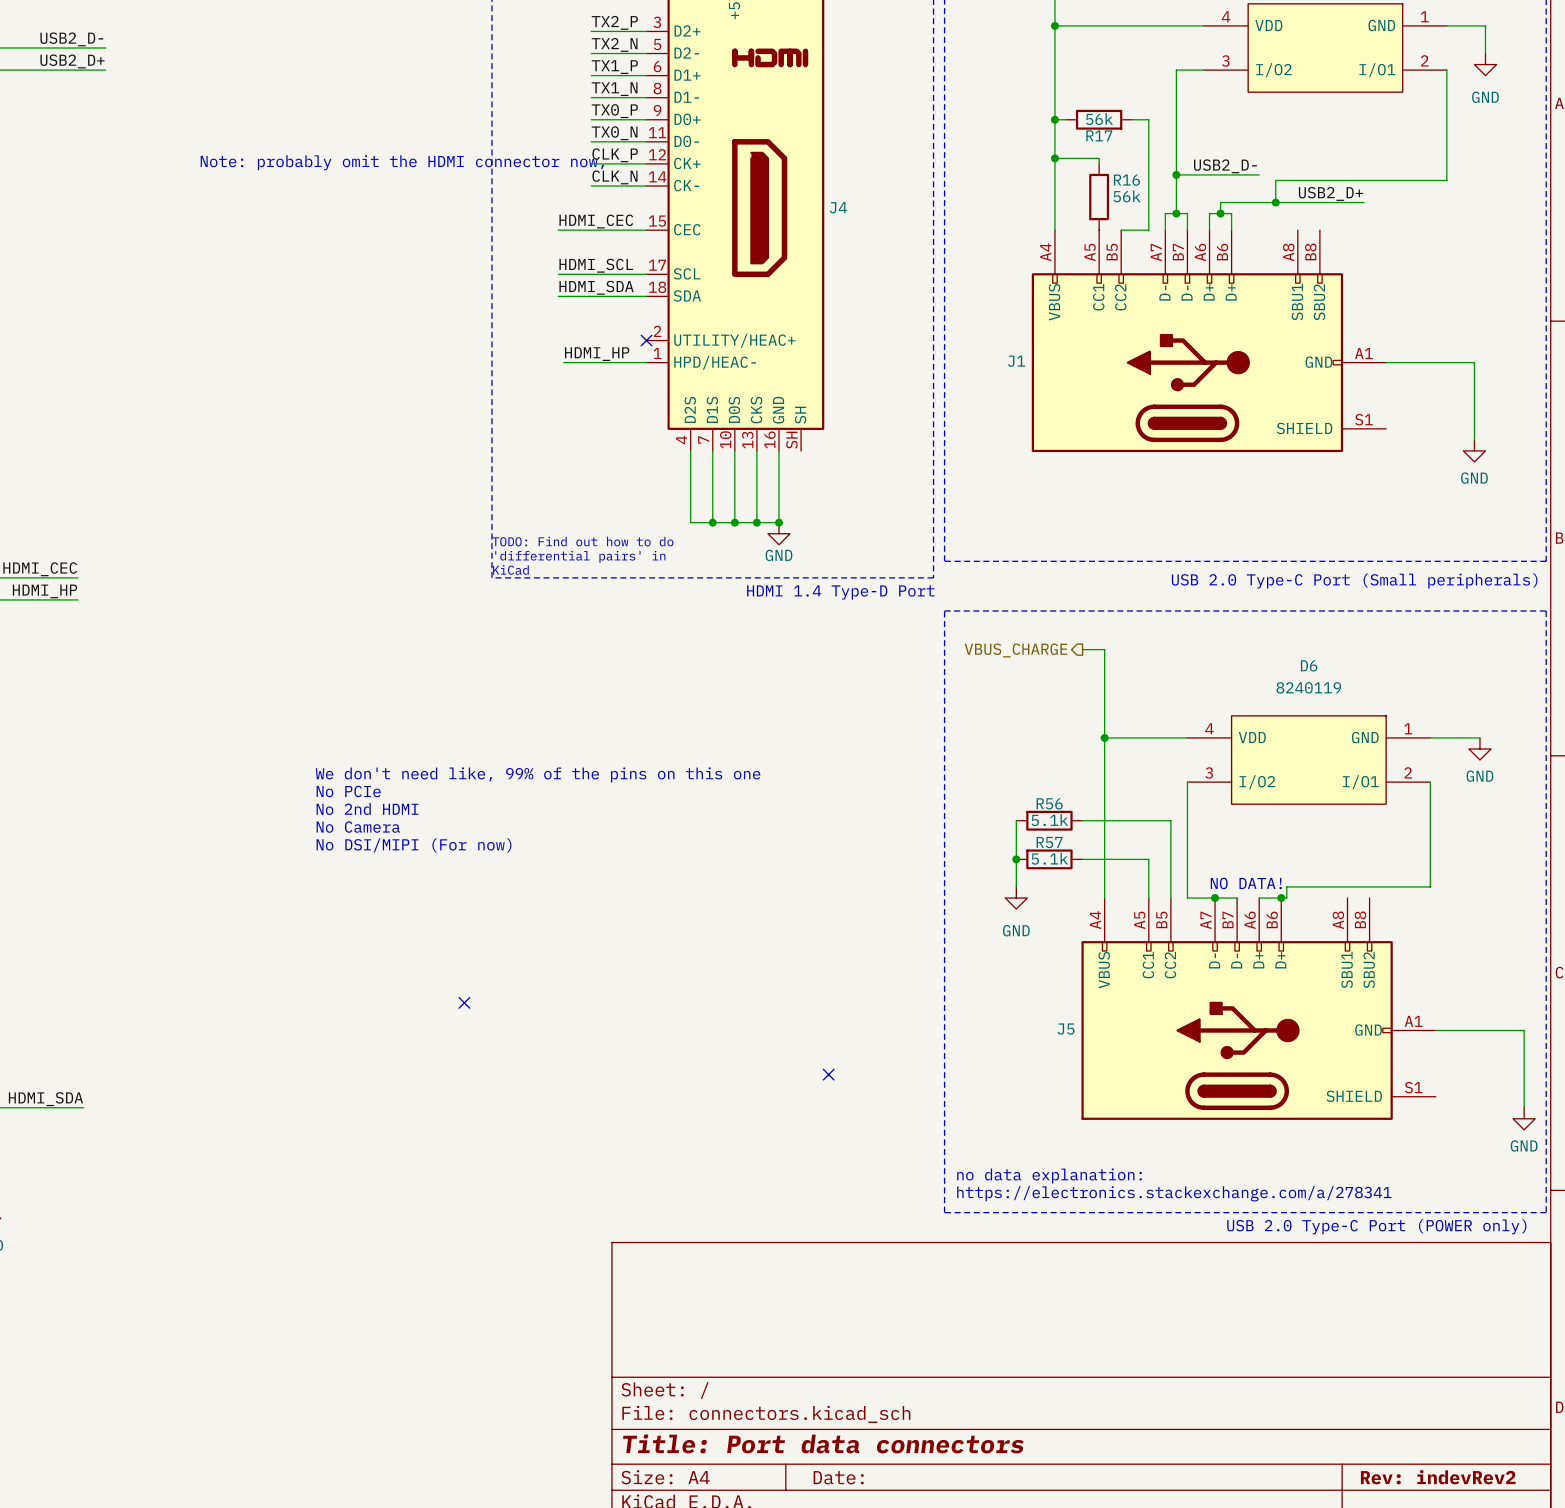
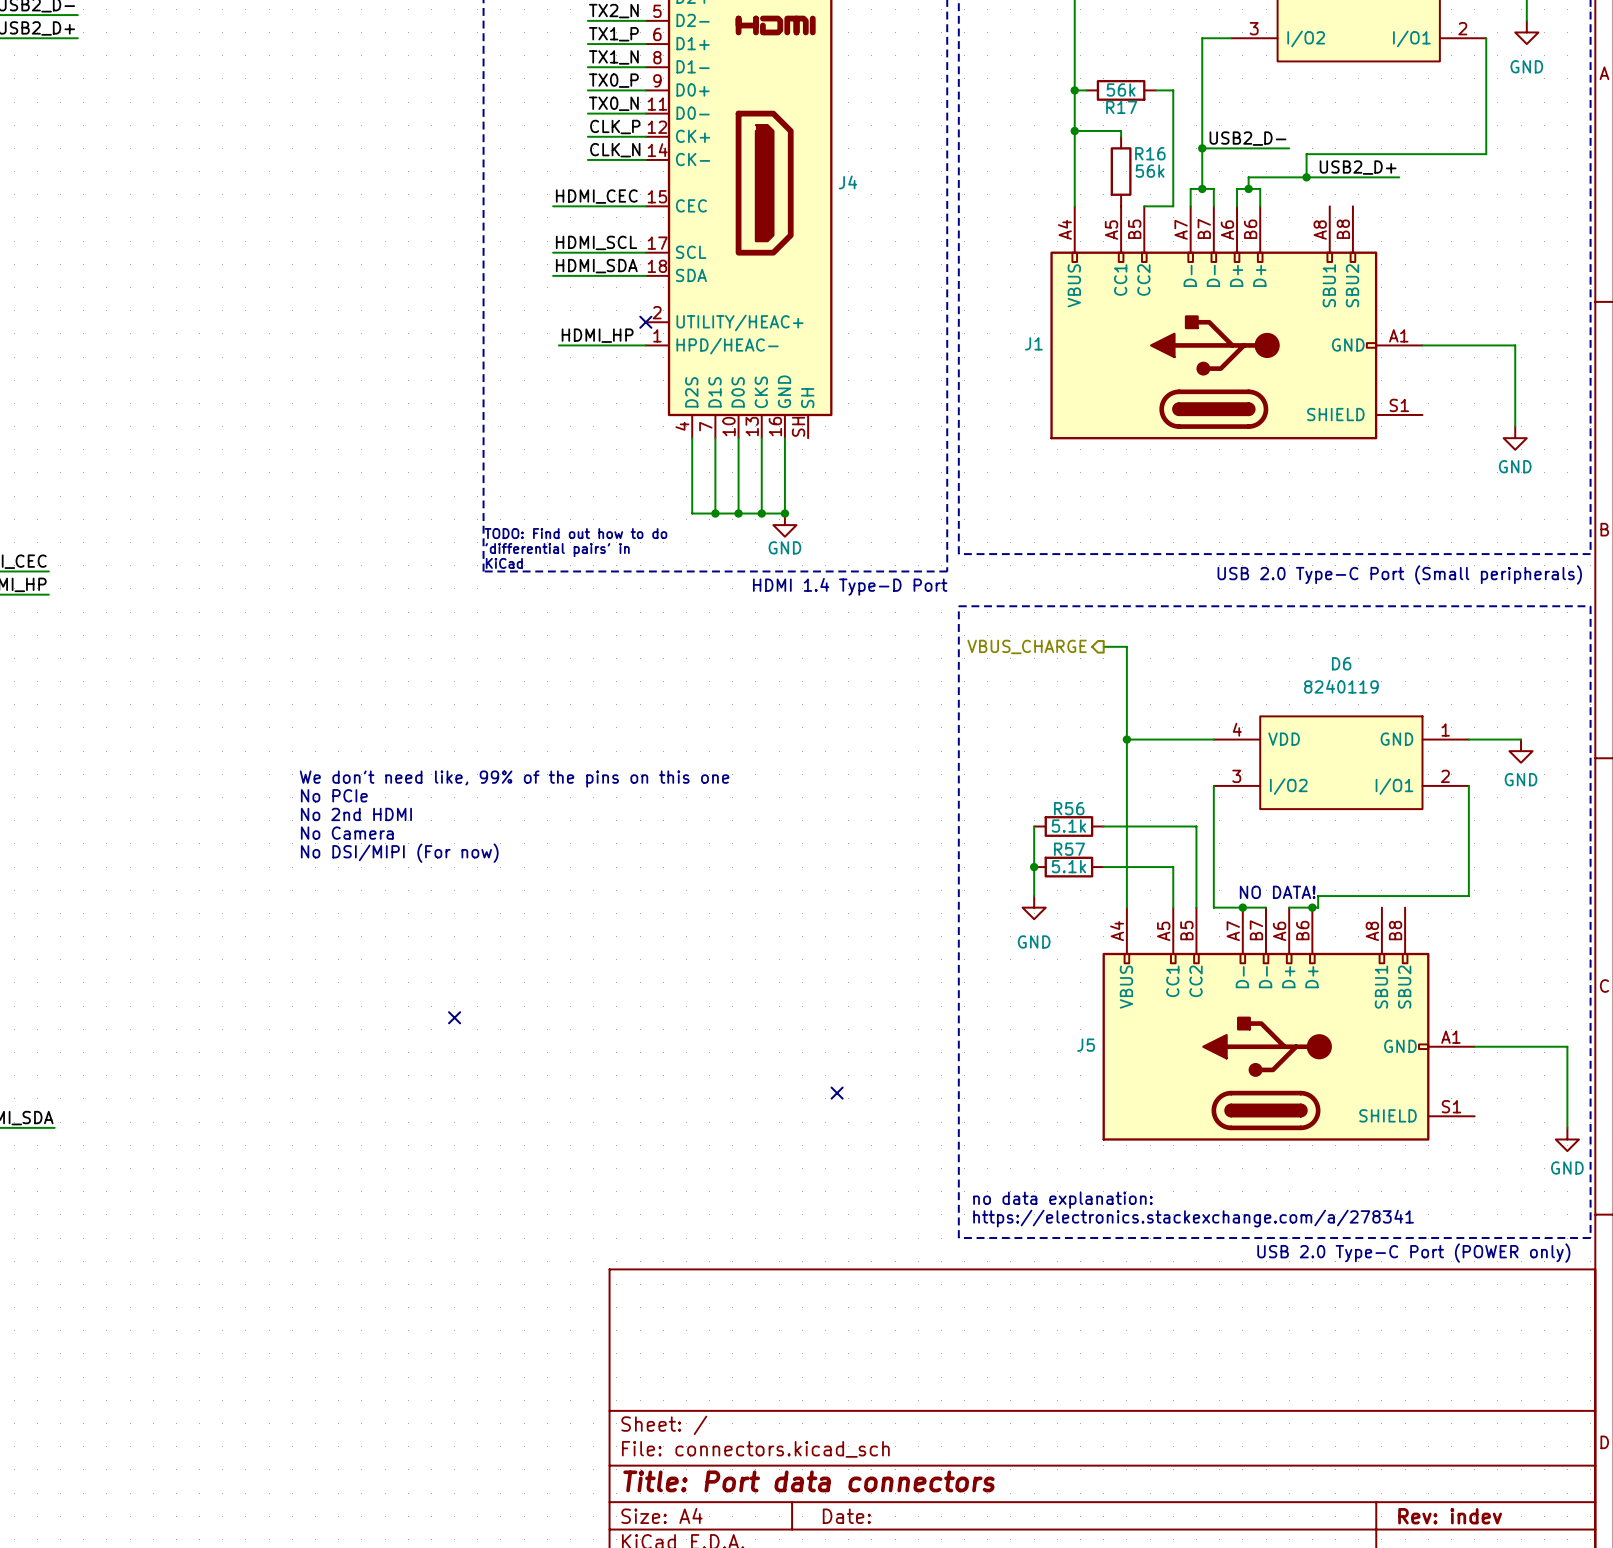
text: Note: probably omit the HDMI connector now, (402, 162) -> none
title block: Rev: indevRev2 (1438, 1477) -> Rev: indev (1450, 1516)

